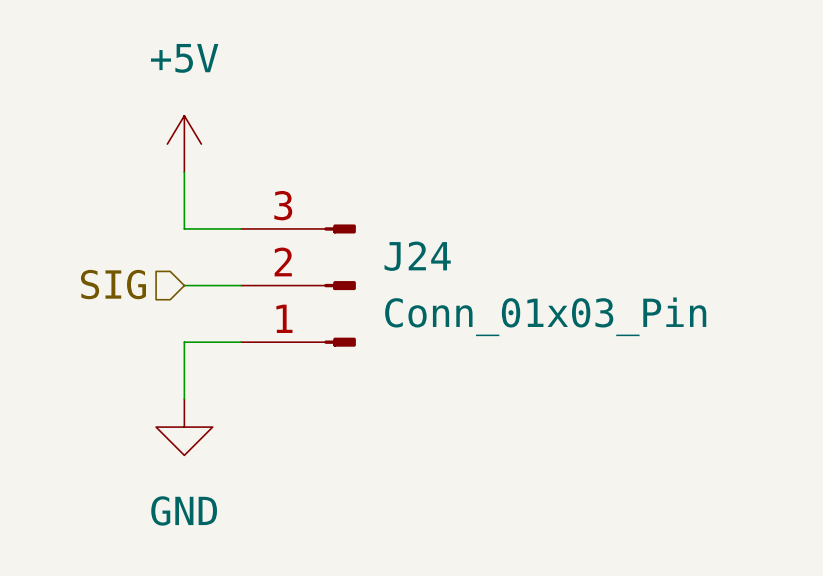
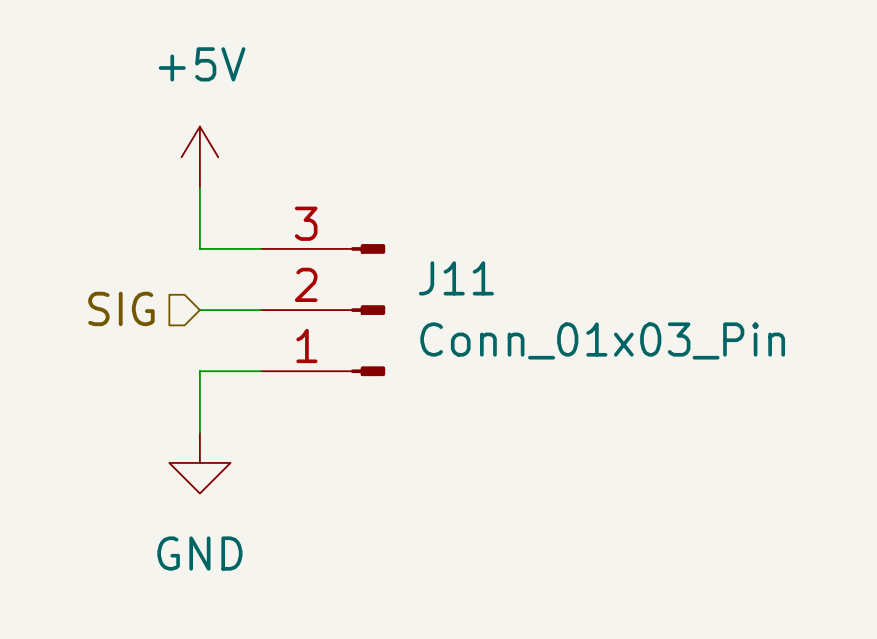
J24 name: J24 (417, 256) -> J11 (456, 278)

